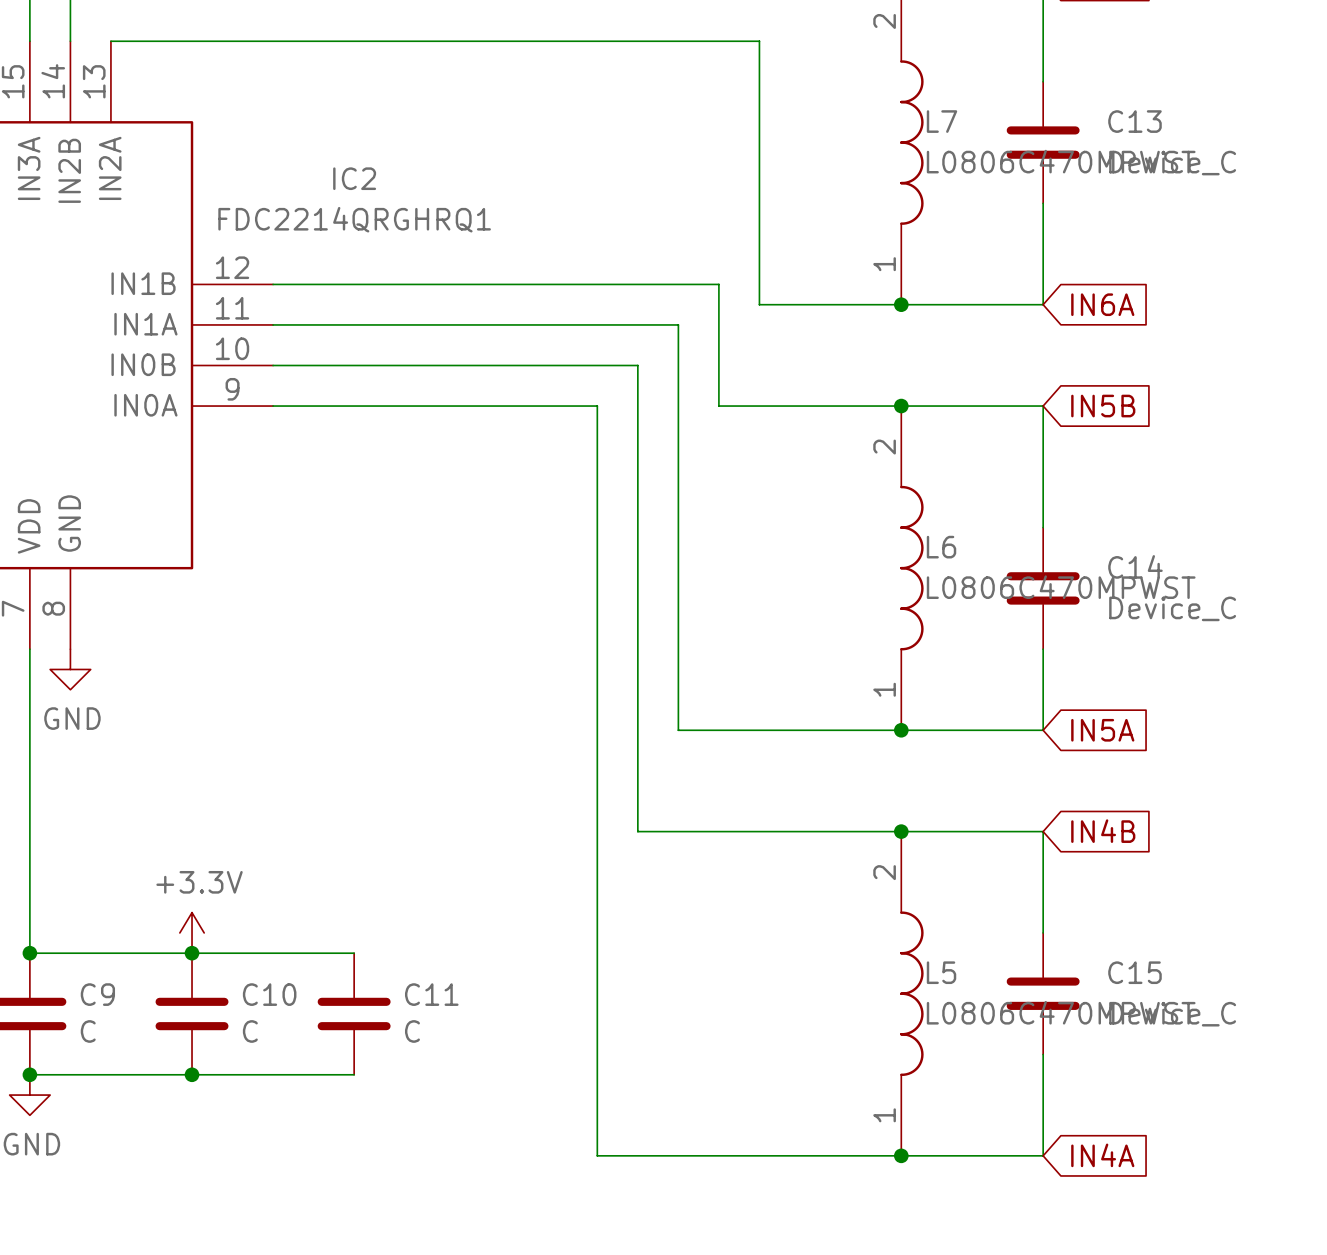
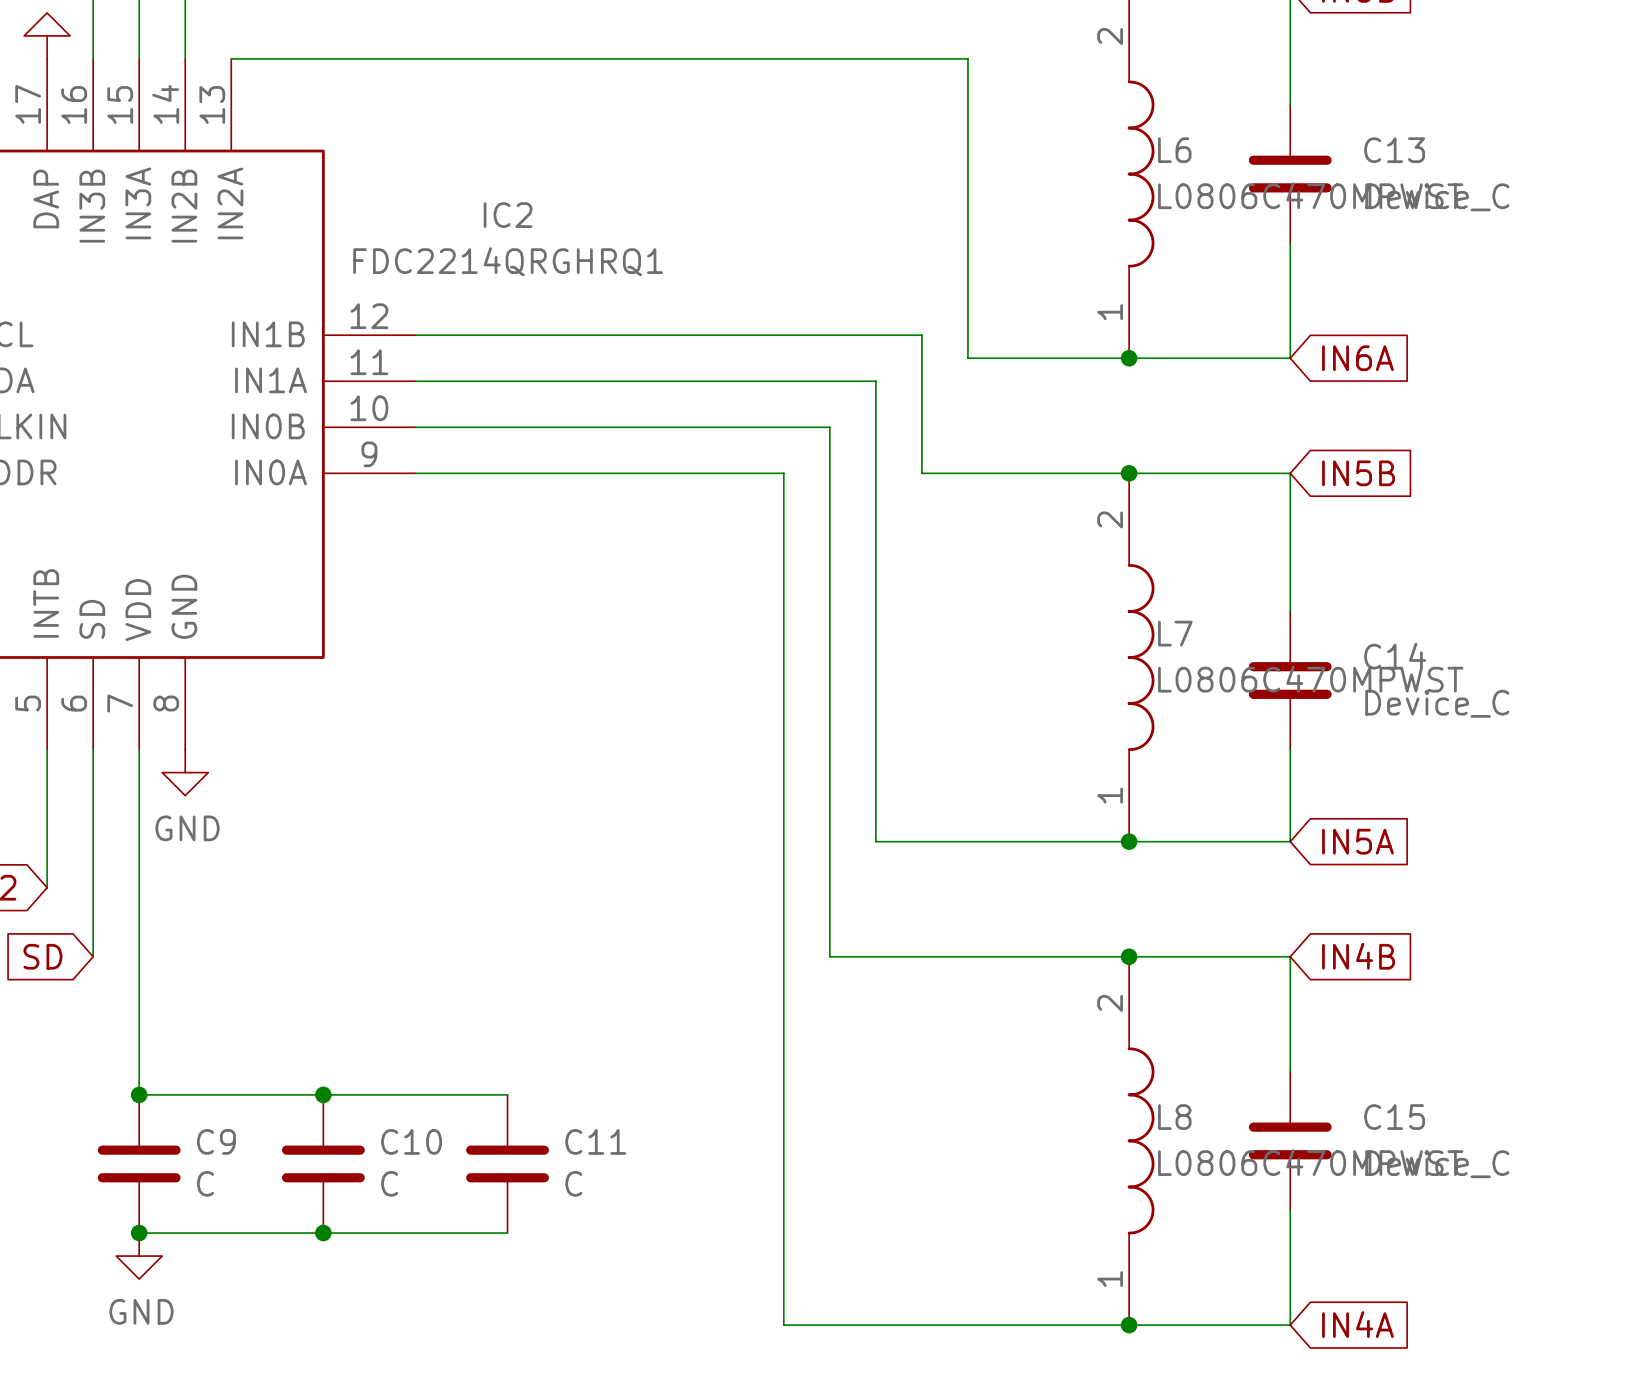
L7 name: L7 (941, 121) -> L6 (1174, 150)
L6 name: L6 (941, 547) -> L7 (1175, 633)
power symbol: +3.3V (192, 932) -> none
L5 name: L5 (941, 972) -> L8 (1174, 1117)

